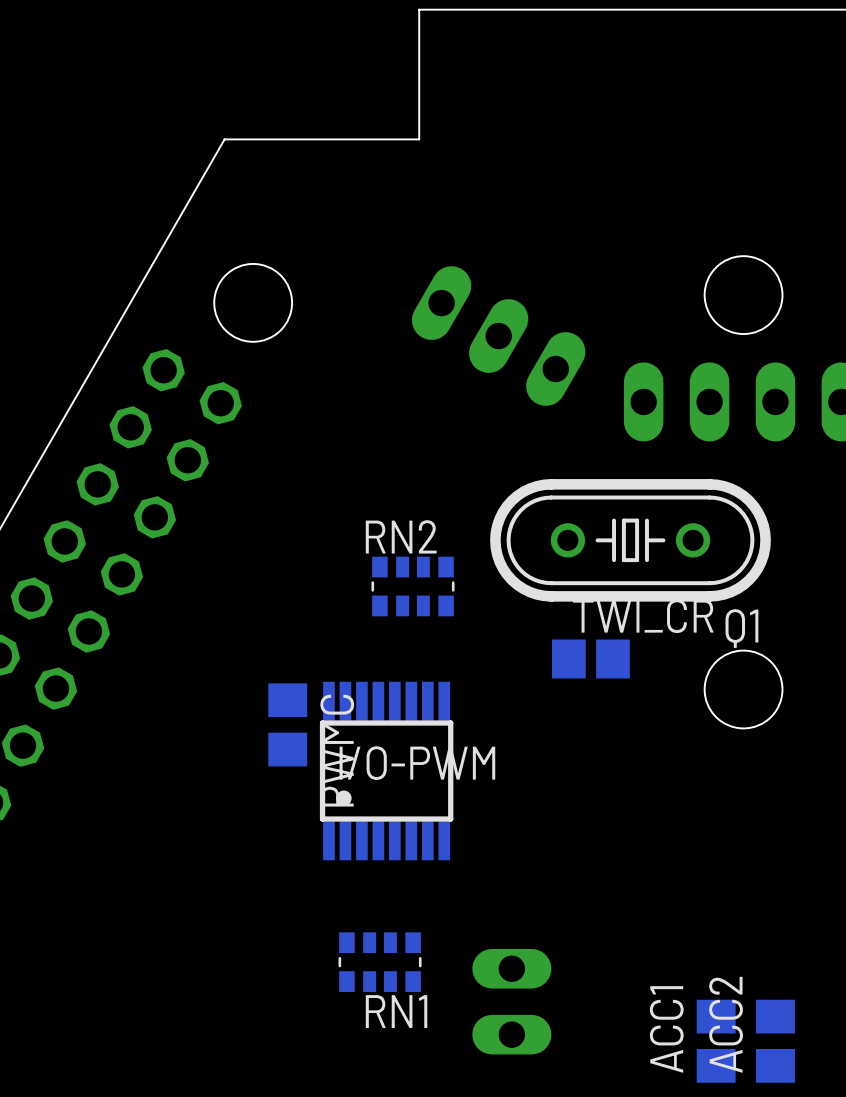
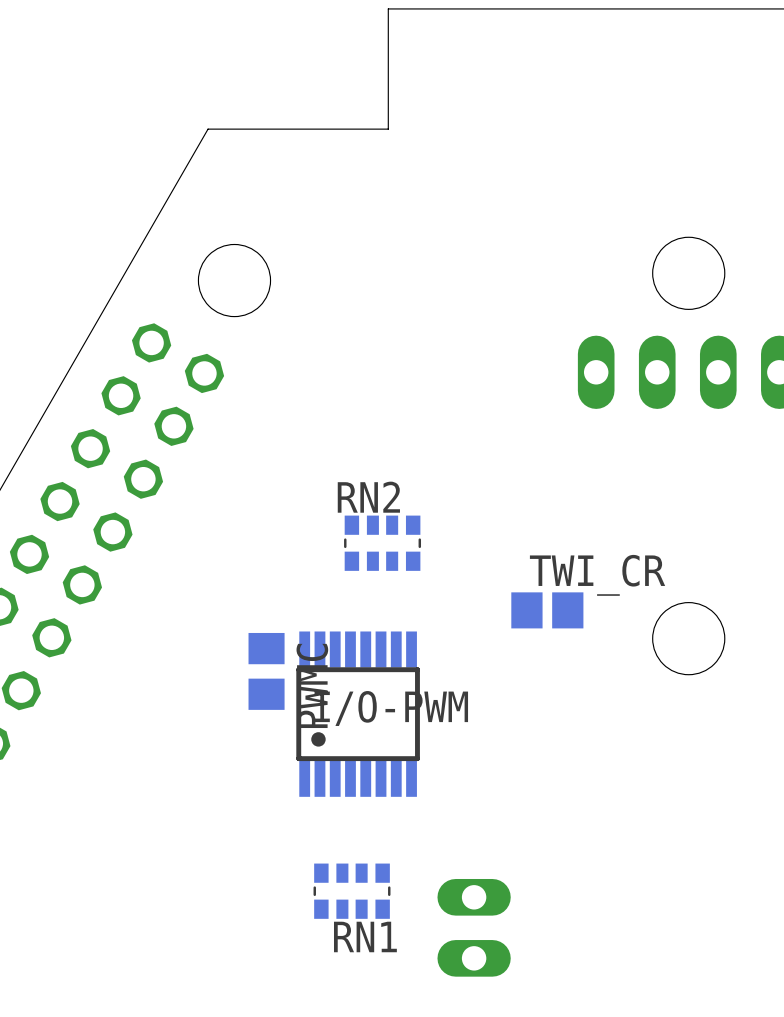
part: (498, 336) -> none
Q1: (630, 540) -> none
ACC1: (716, 1041) -> none
ACC2: (775, 1041) -> none

